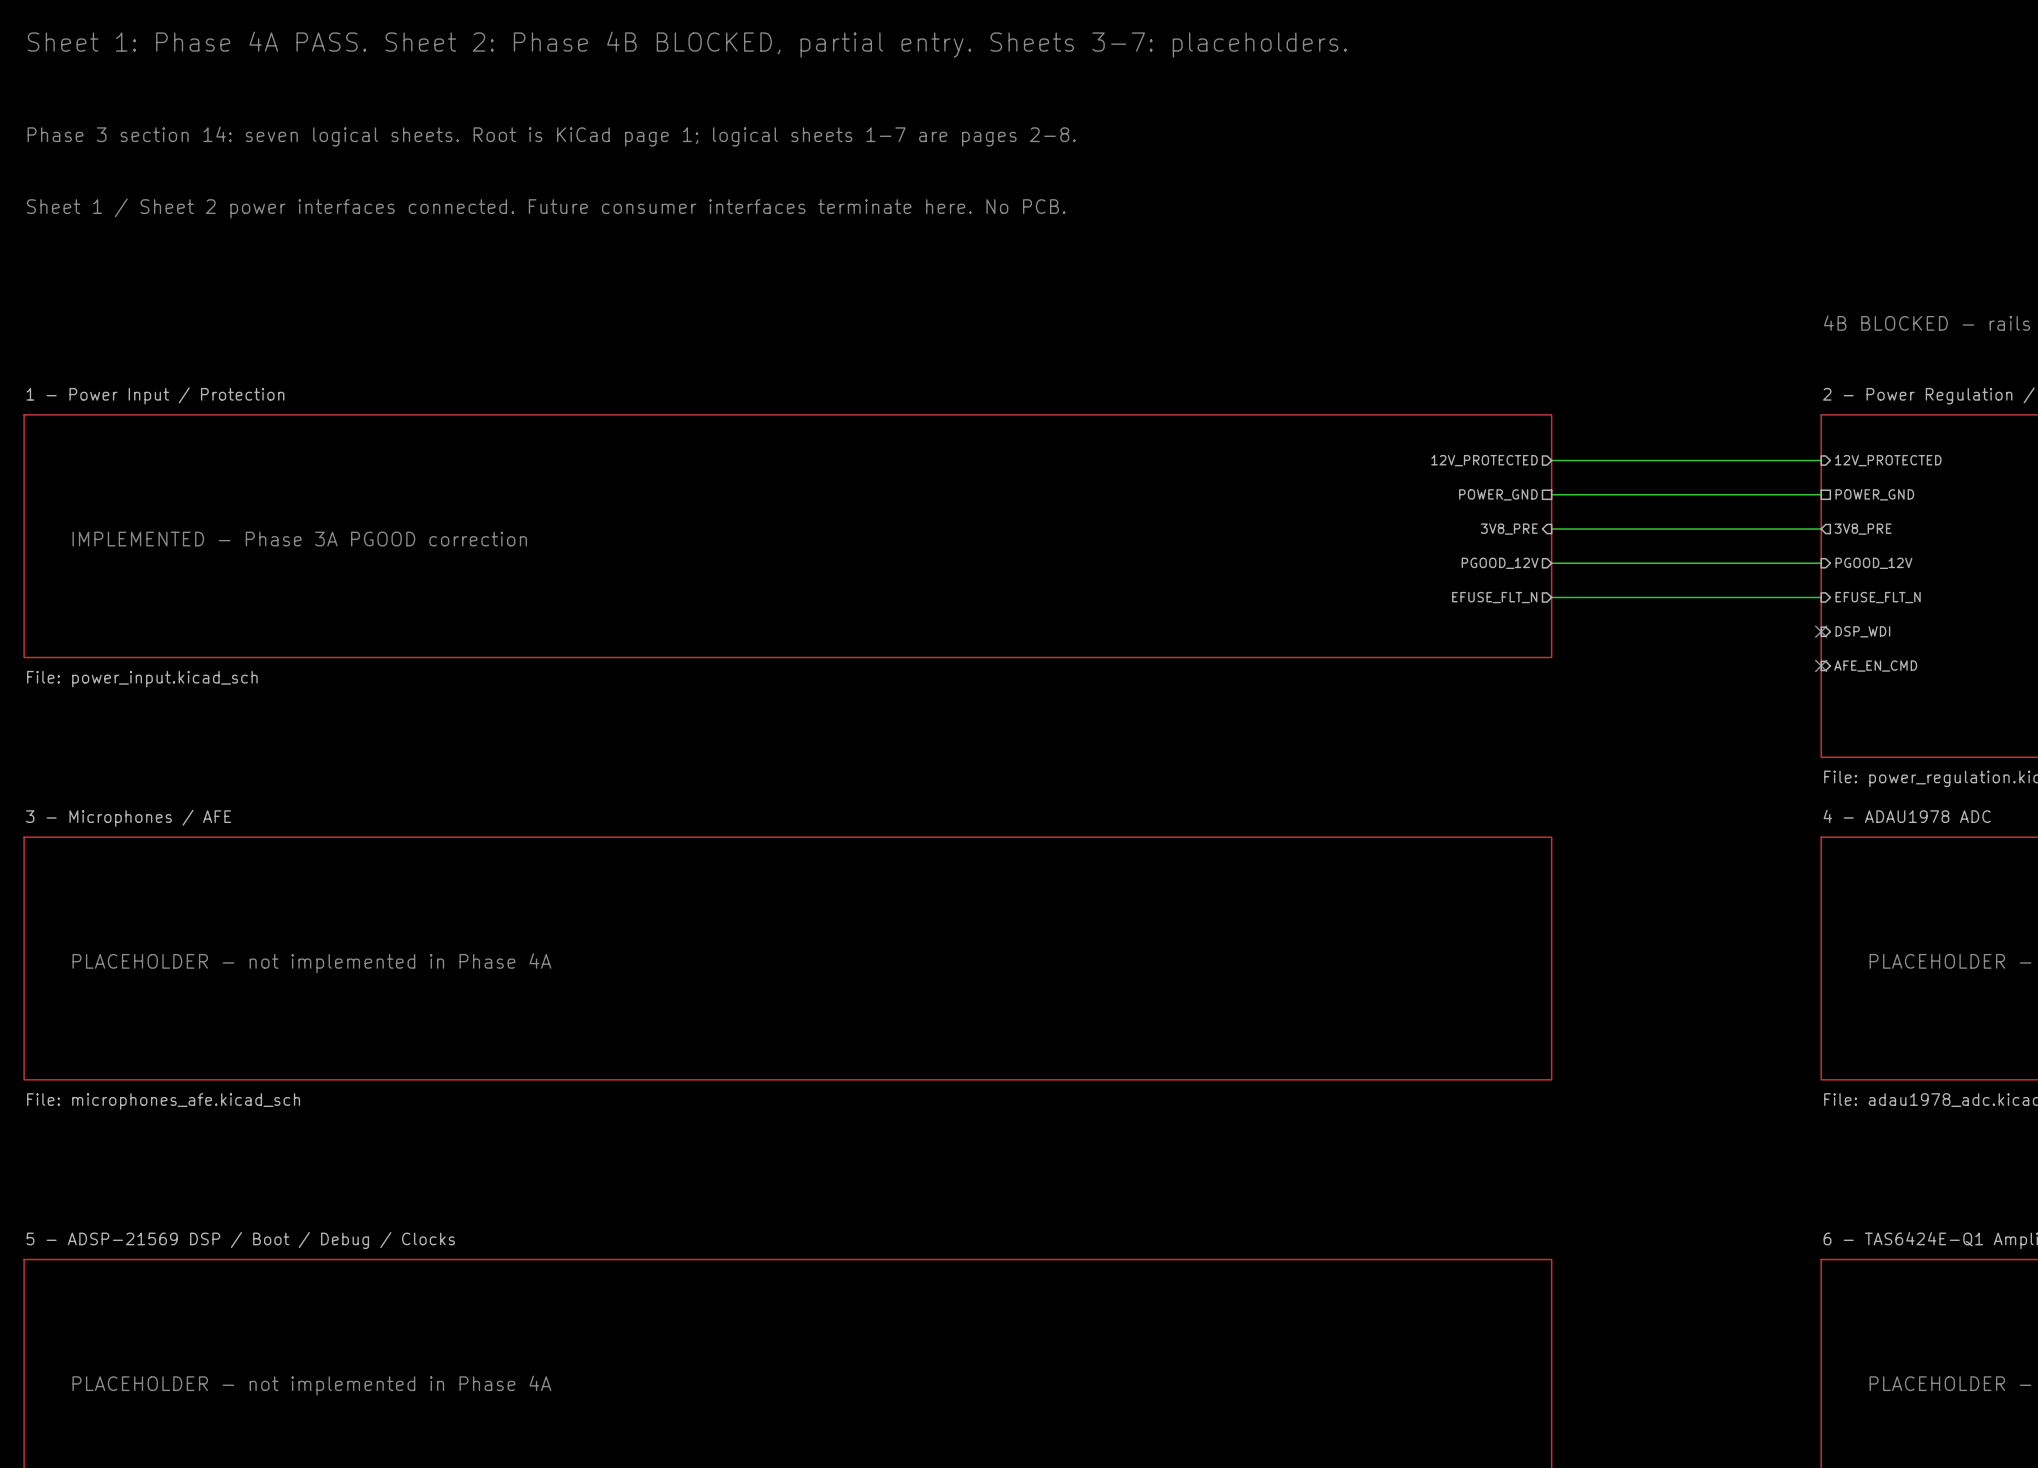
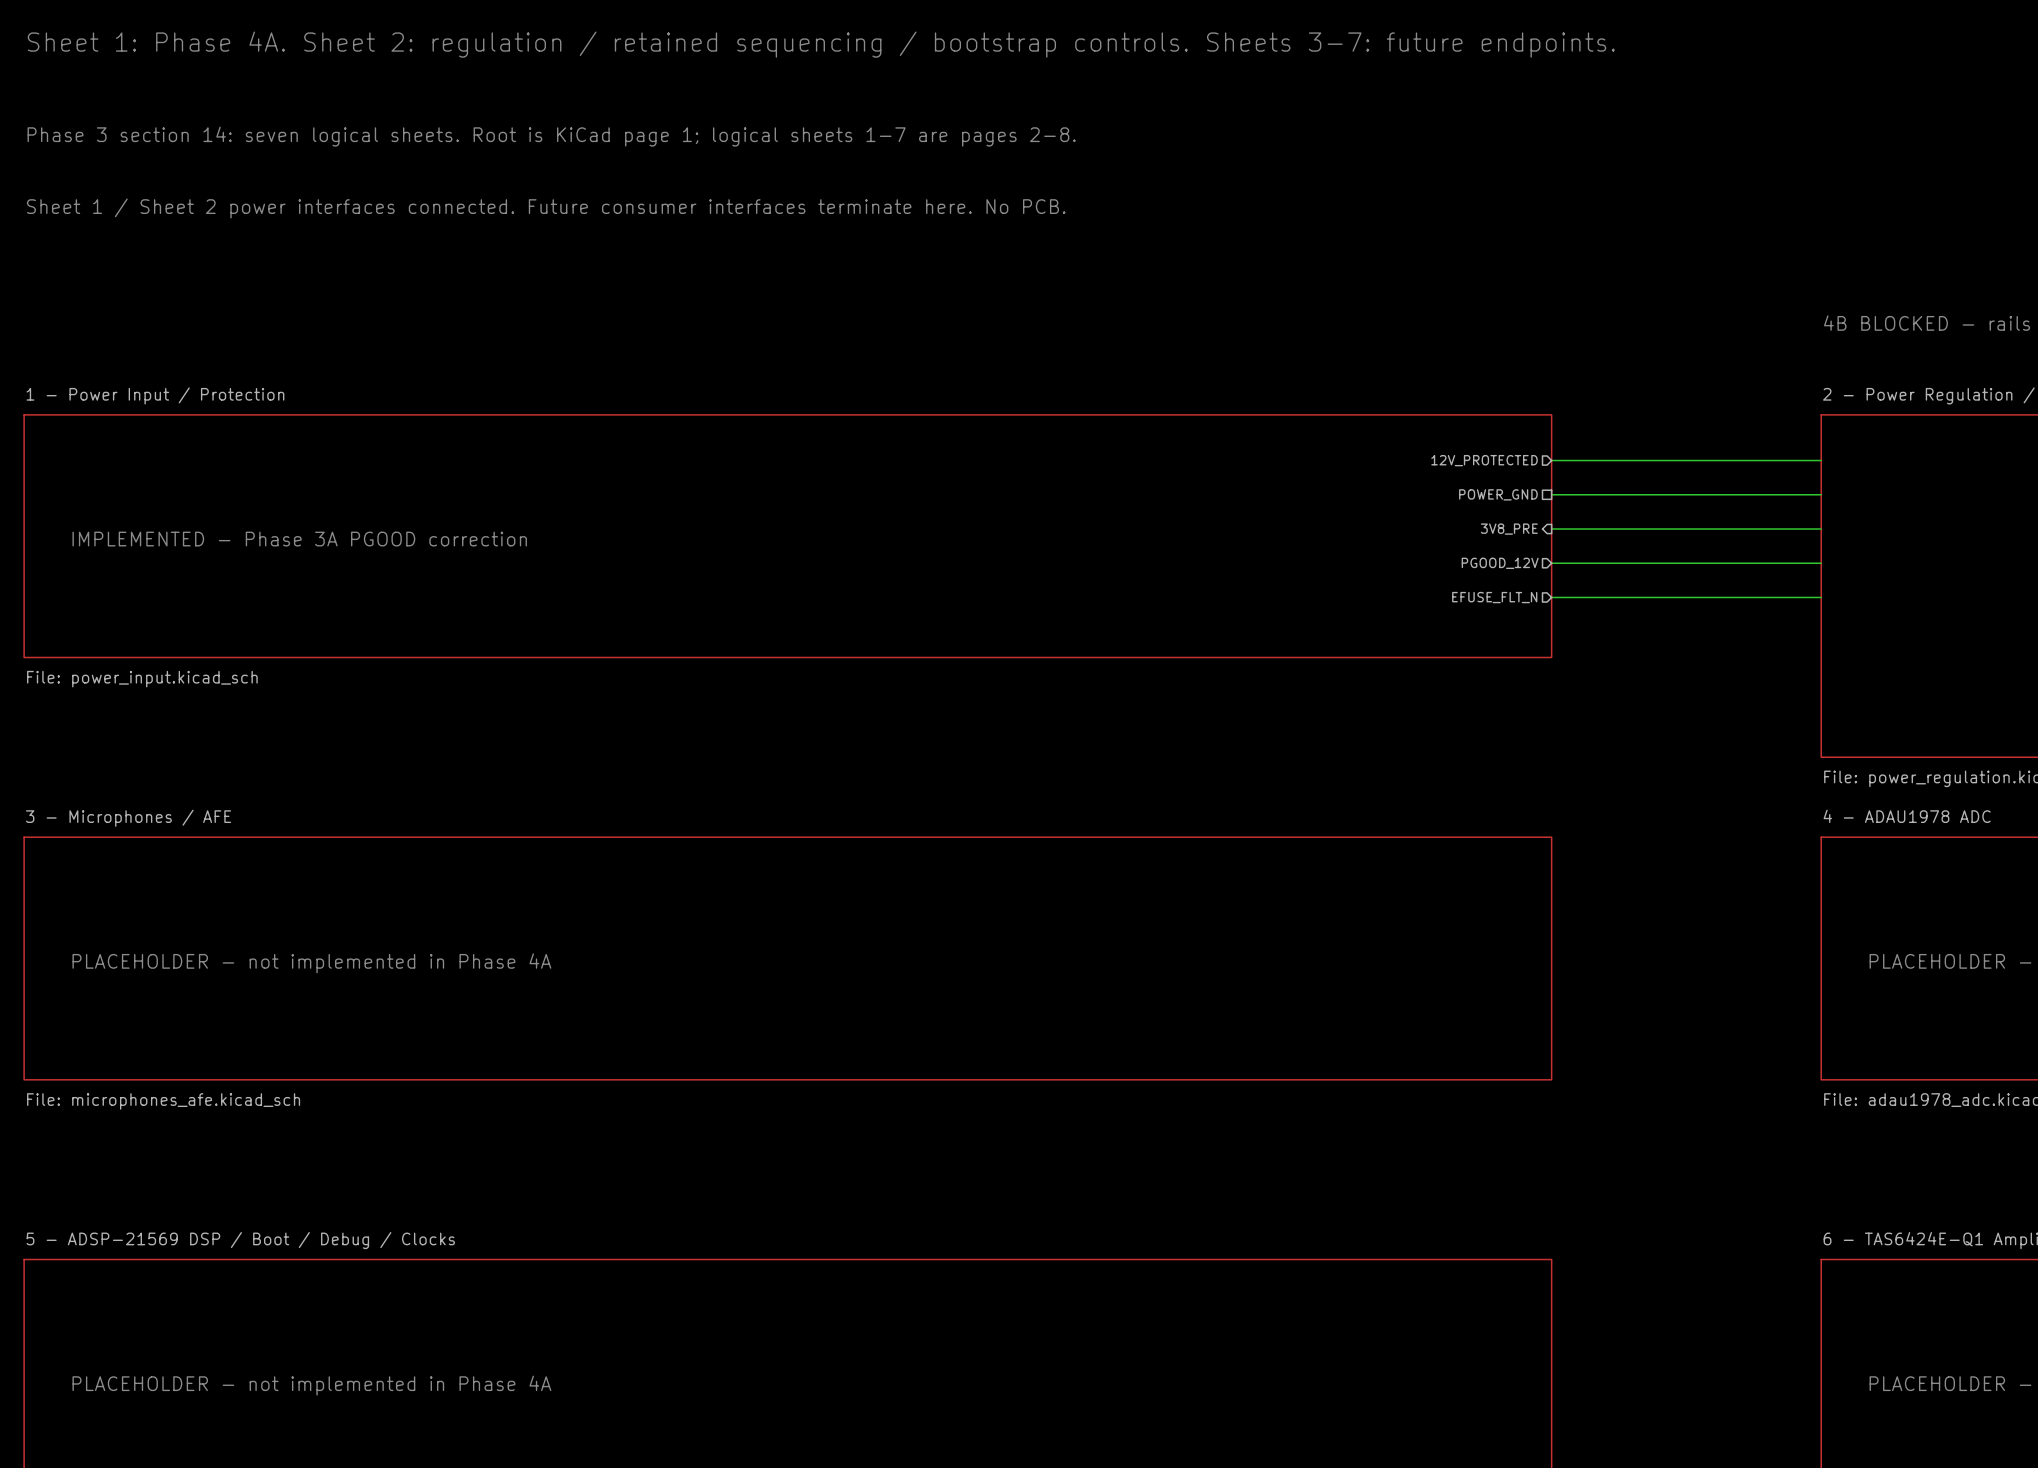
text: Sheet 1: Phase 4A PASS. Sheet 2: Phase 4B BLOCKED, partial entry. Sheets 3-7: placeholders. (687, 44) -> Sheet 1: Phase 4A. Sheet 2: regulation / retained sequencing / bootstrap controls. Sheets 3-7: future endpoints. (821, 44)
sheet pin: 12V_PROTECTED (1888, 460) -> none
sheet pin: POWER_GND (1874, 494) -> none
sheet pin: 3V8_PRE (1863, 529) -> none
sheet pin: PGOOD_12V (1873, 563) -> none
sheet pin: EFUSE_FLT_N (1878, 597) -> none
no-connect mark: (1821, 631) -> none
sheet pin: DSP_WDI (1862, 631) -> none
no-connect mark: (1821, 665) -> none
sheet pin: AFE_EN_CMD (1875, 666) -> none

